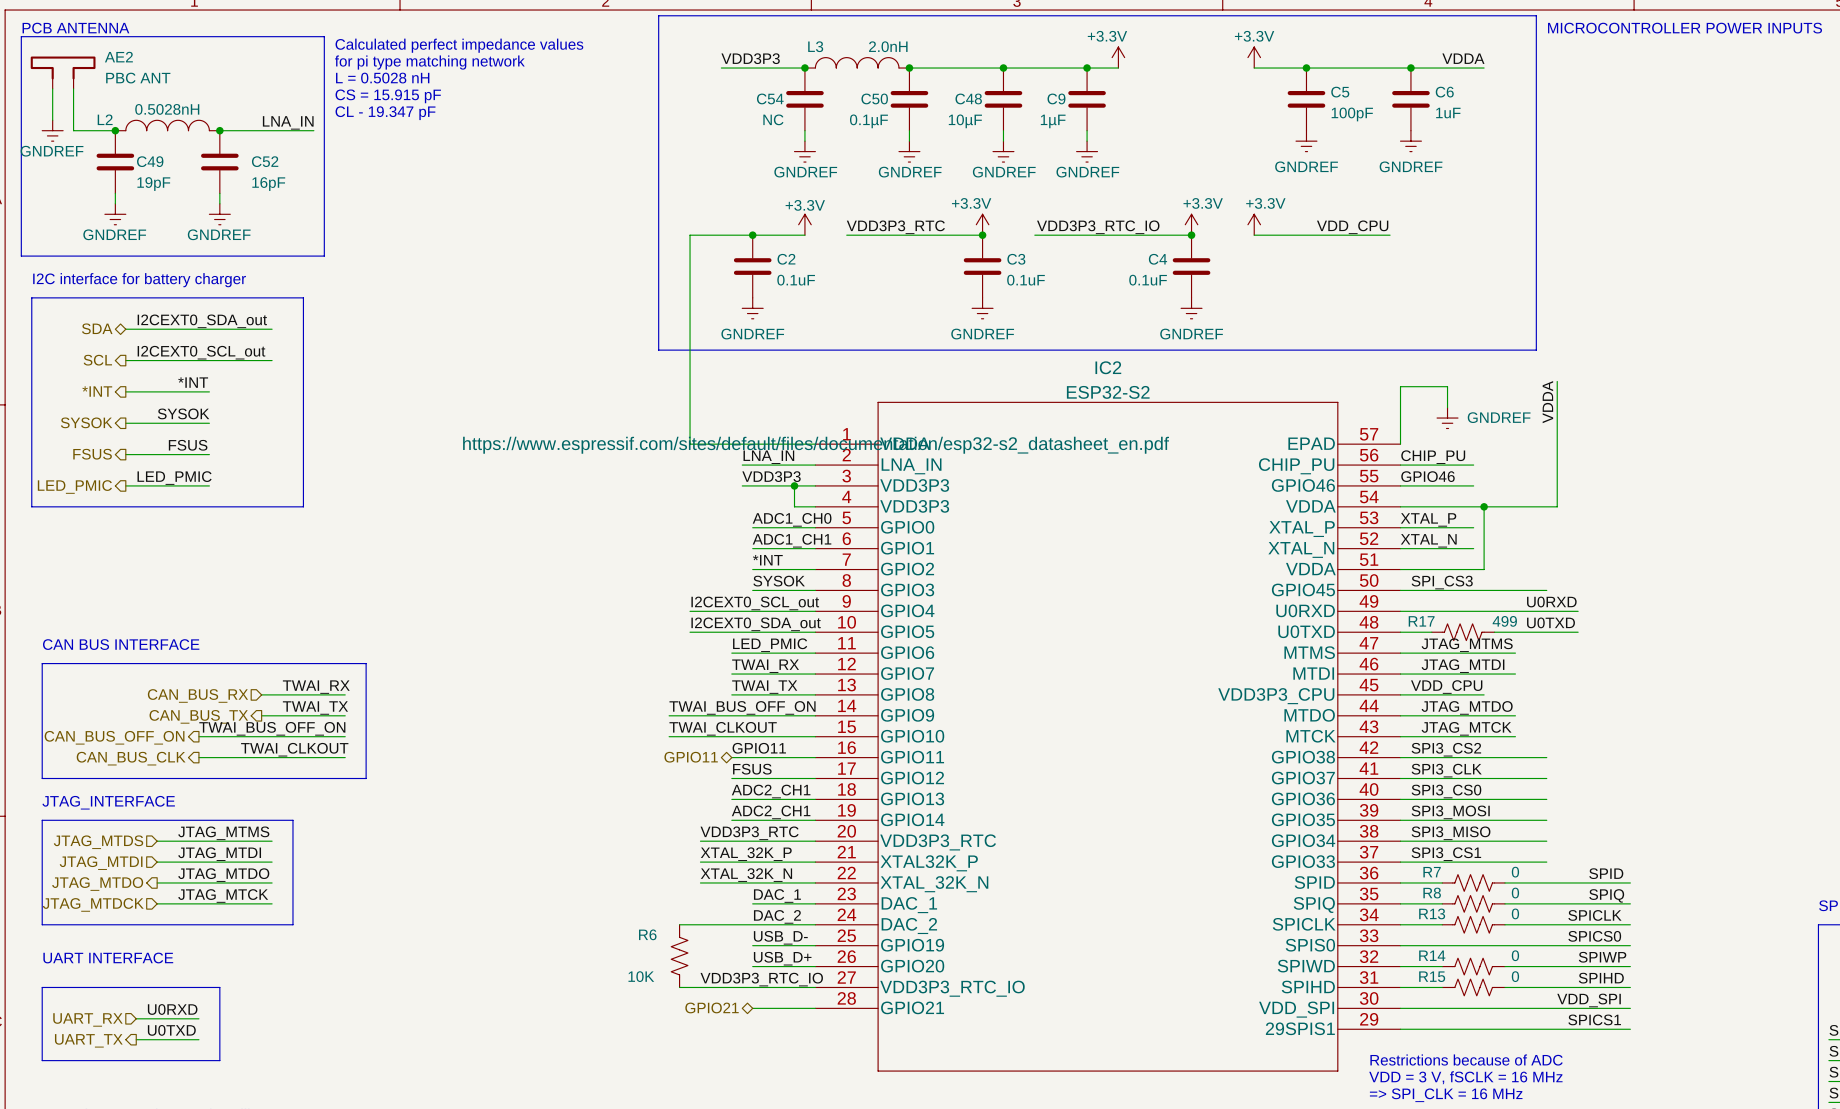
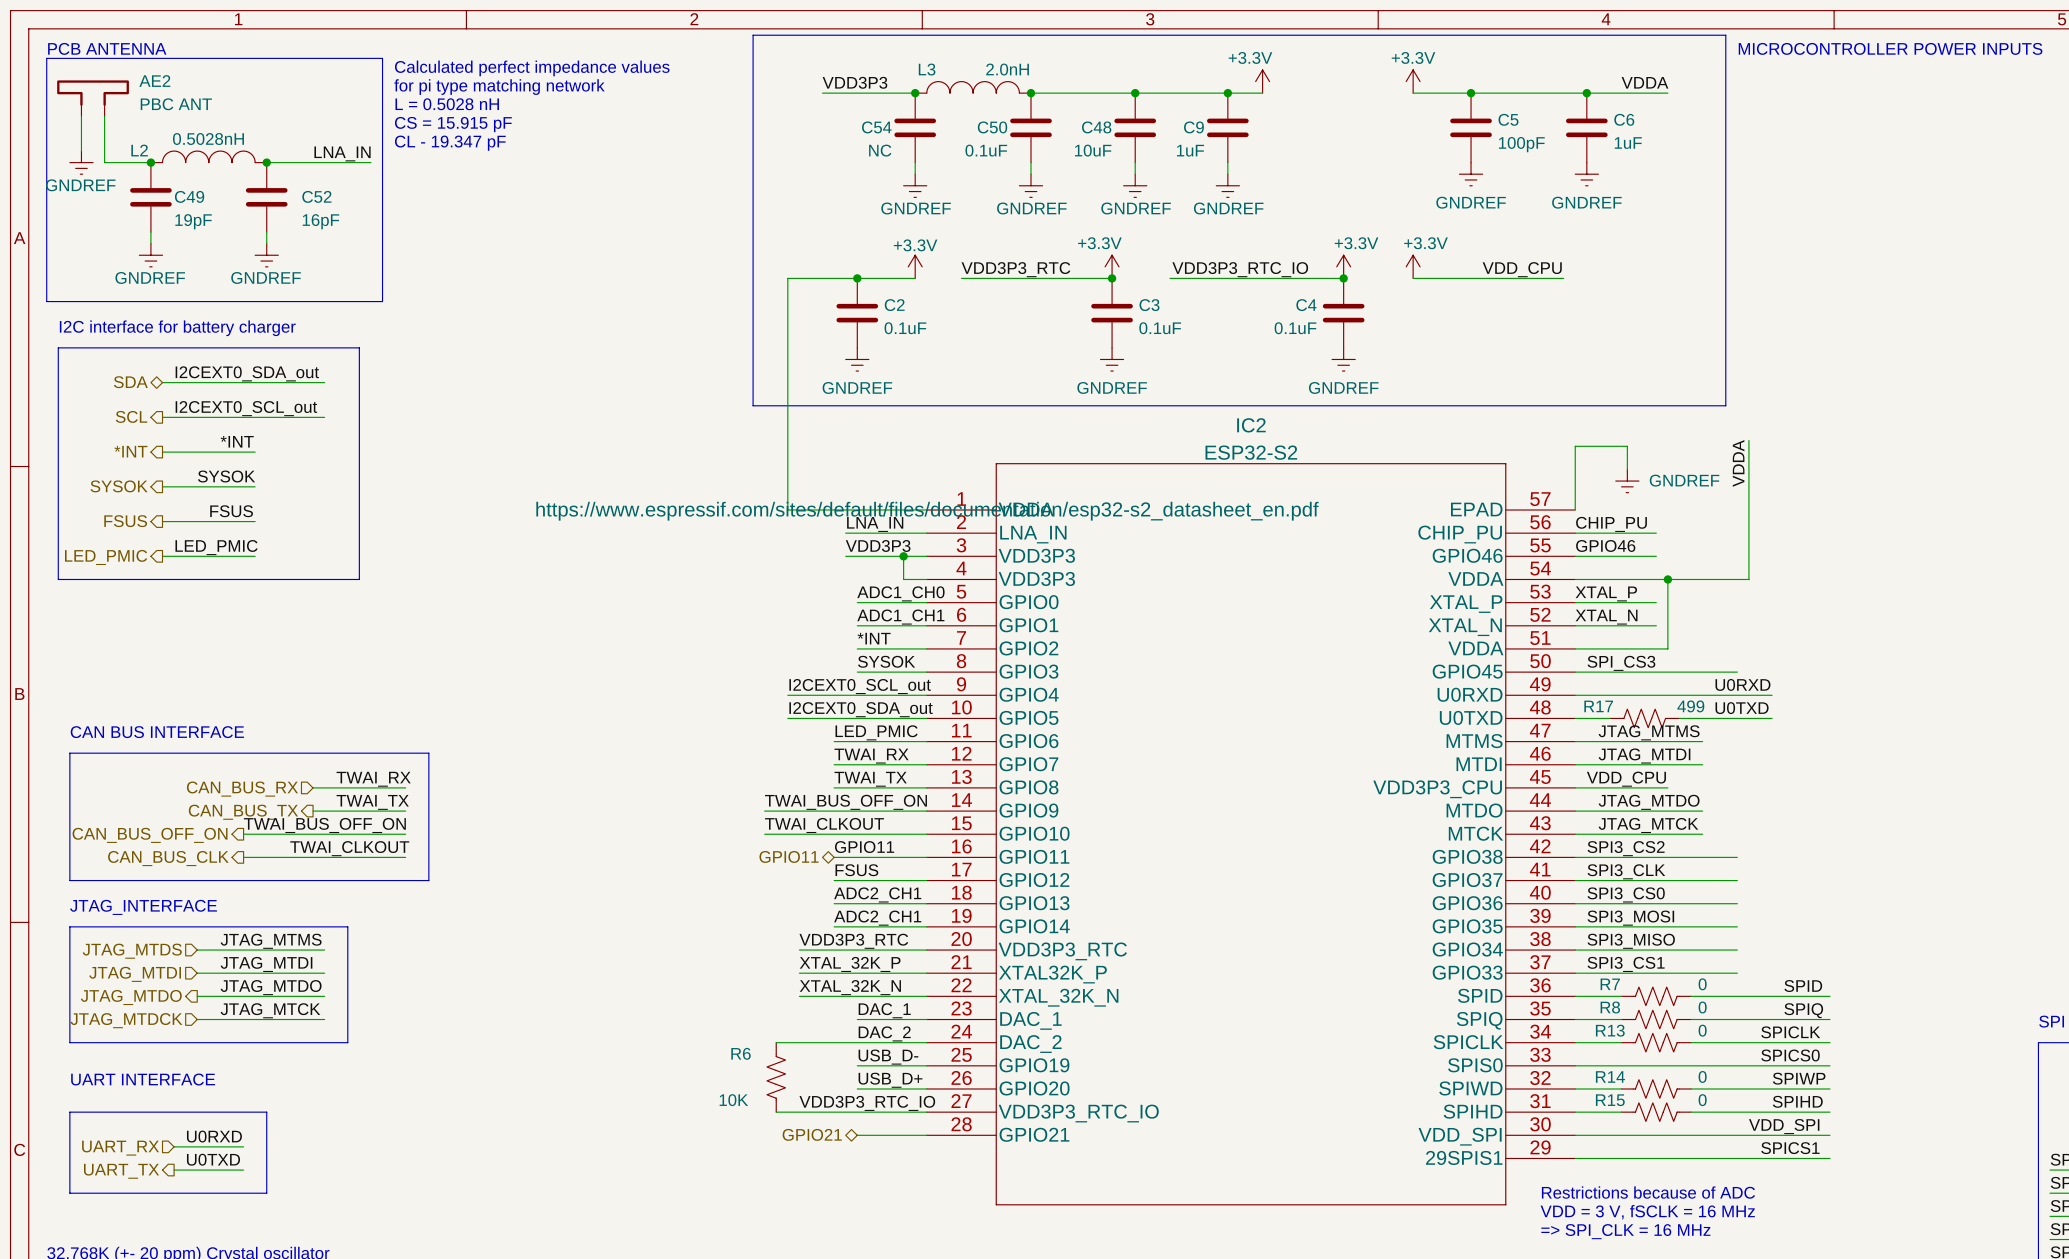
C50 value: 0.1µF (868, 121) -> 0.1uF (986, 150)
C48 value: 10µF (965, 121) -> 10uF (1093, 150)
C9 value: 1µF (1053, 121) -> 1uF (1190, 150)

